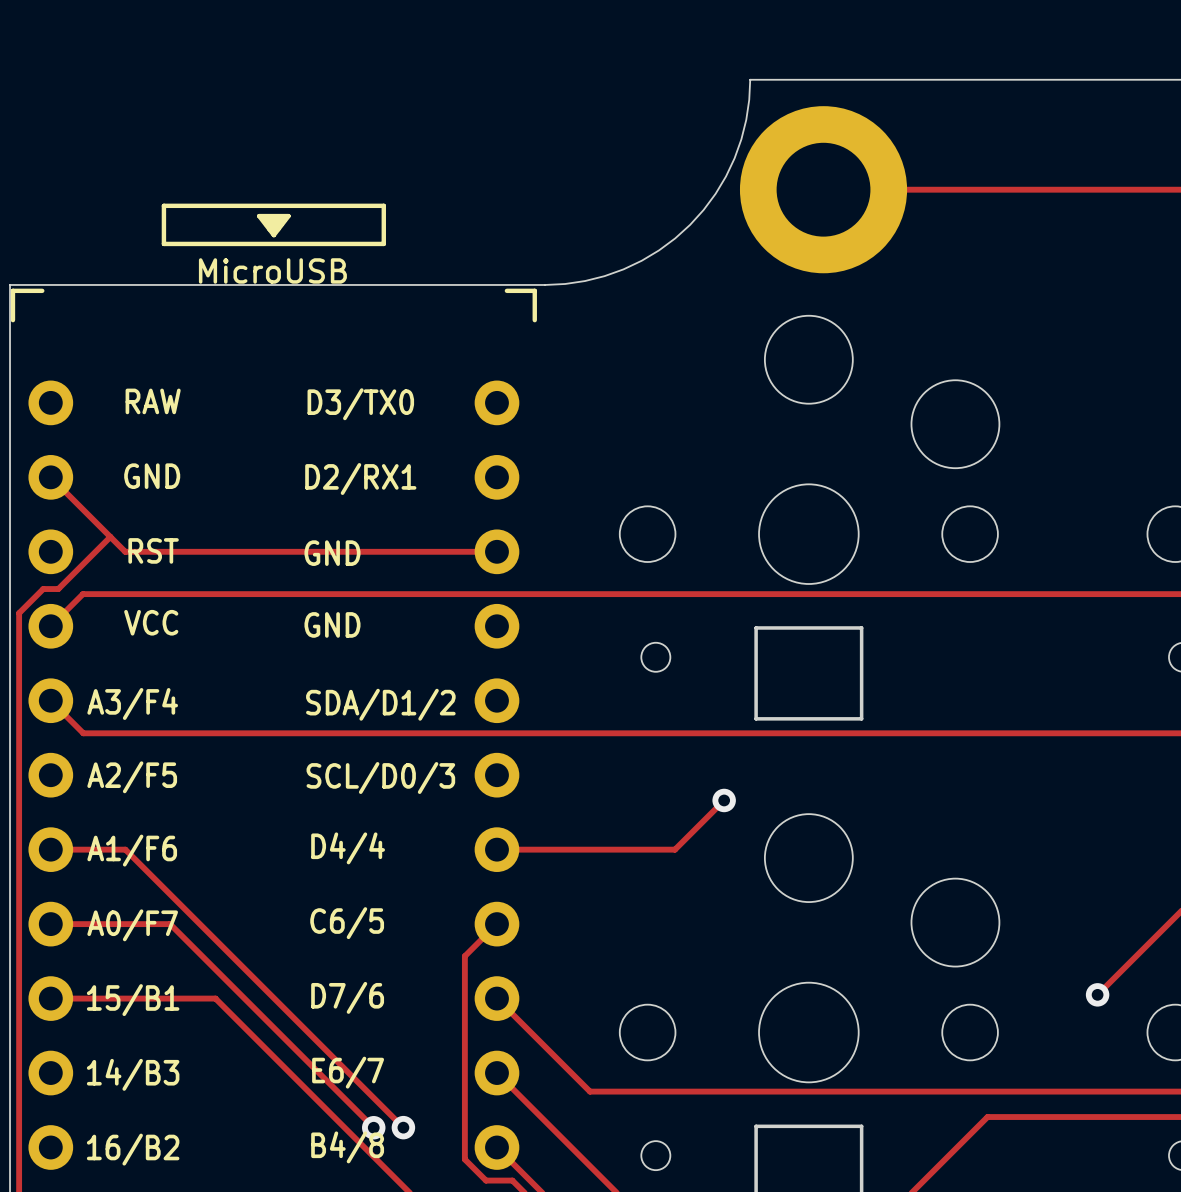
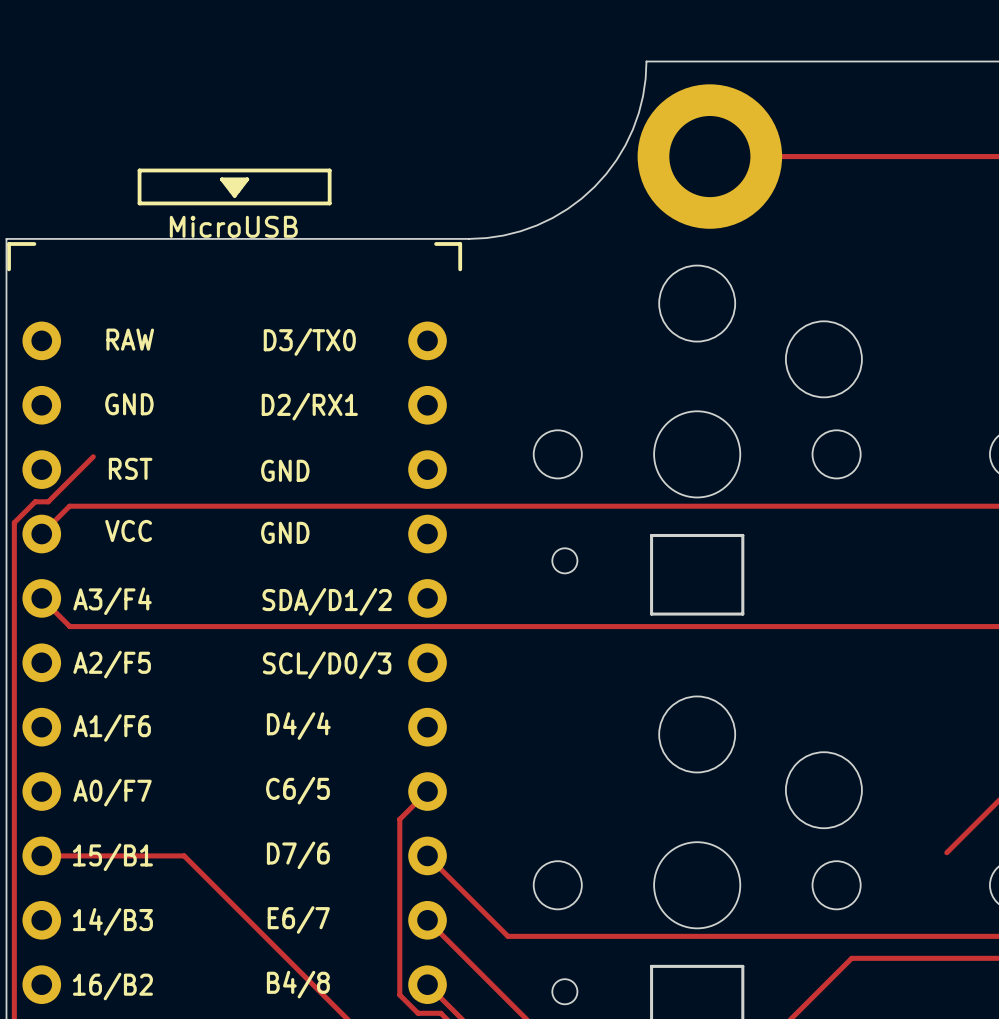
track: (50, 477) (125, 551) (496, 551) -> none
track: (724, 800) (674, 849) (496, 849) -> none
via: (724, 800) -> none
track: (50, 849) (125, 849) (403, 1127) -> none
track: (50, 924) (170, 924) (373, 1127) -> none
via: (1097, 994) -> none
via: (373, 1127) -> none
via: (403, 1127) -> none

